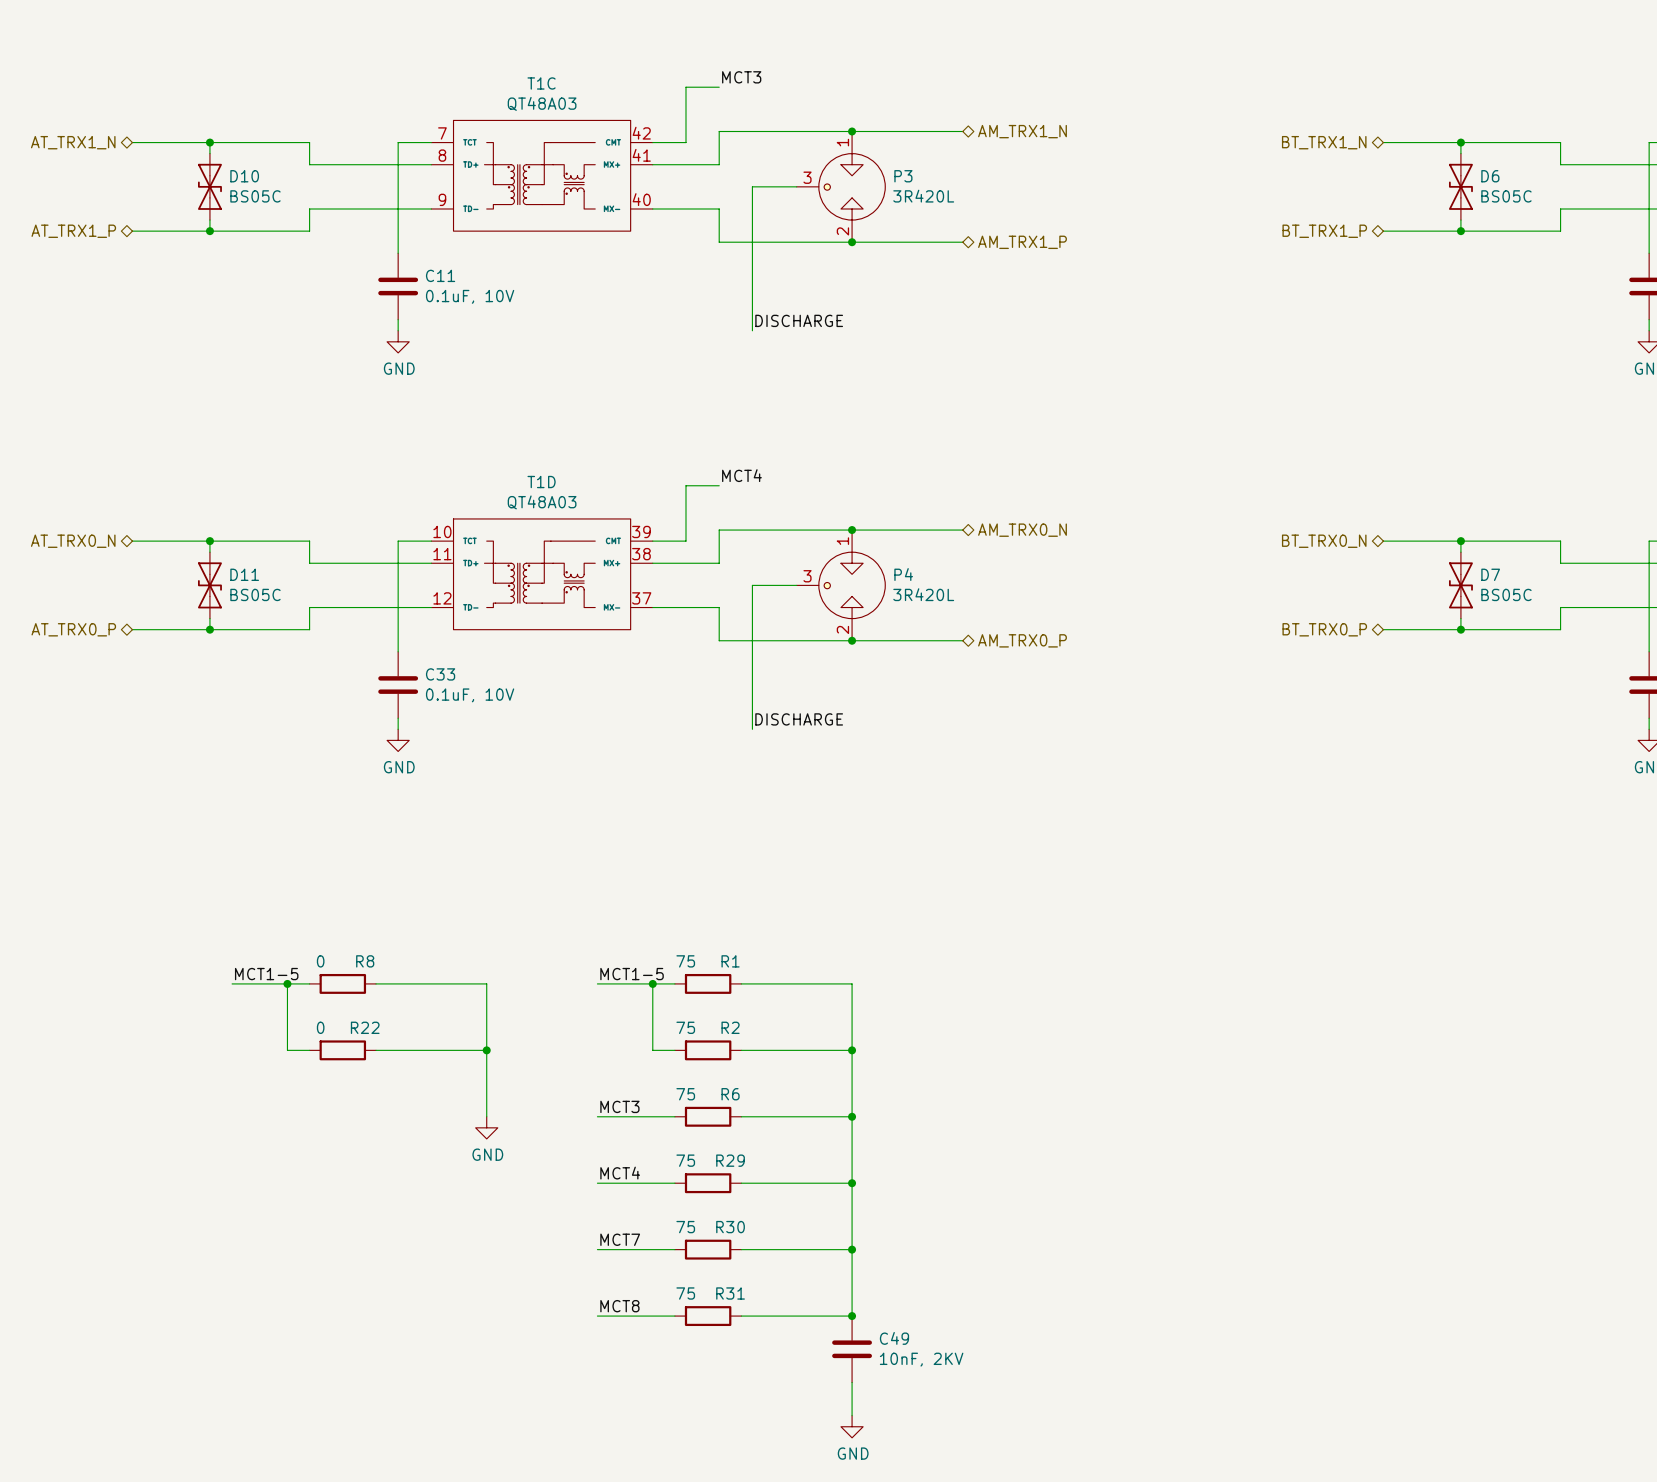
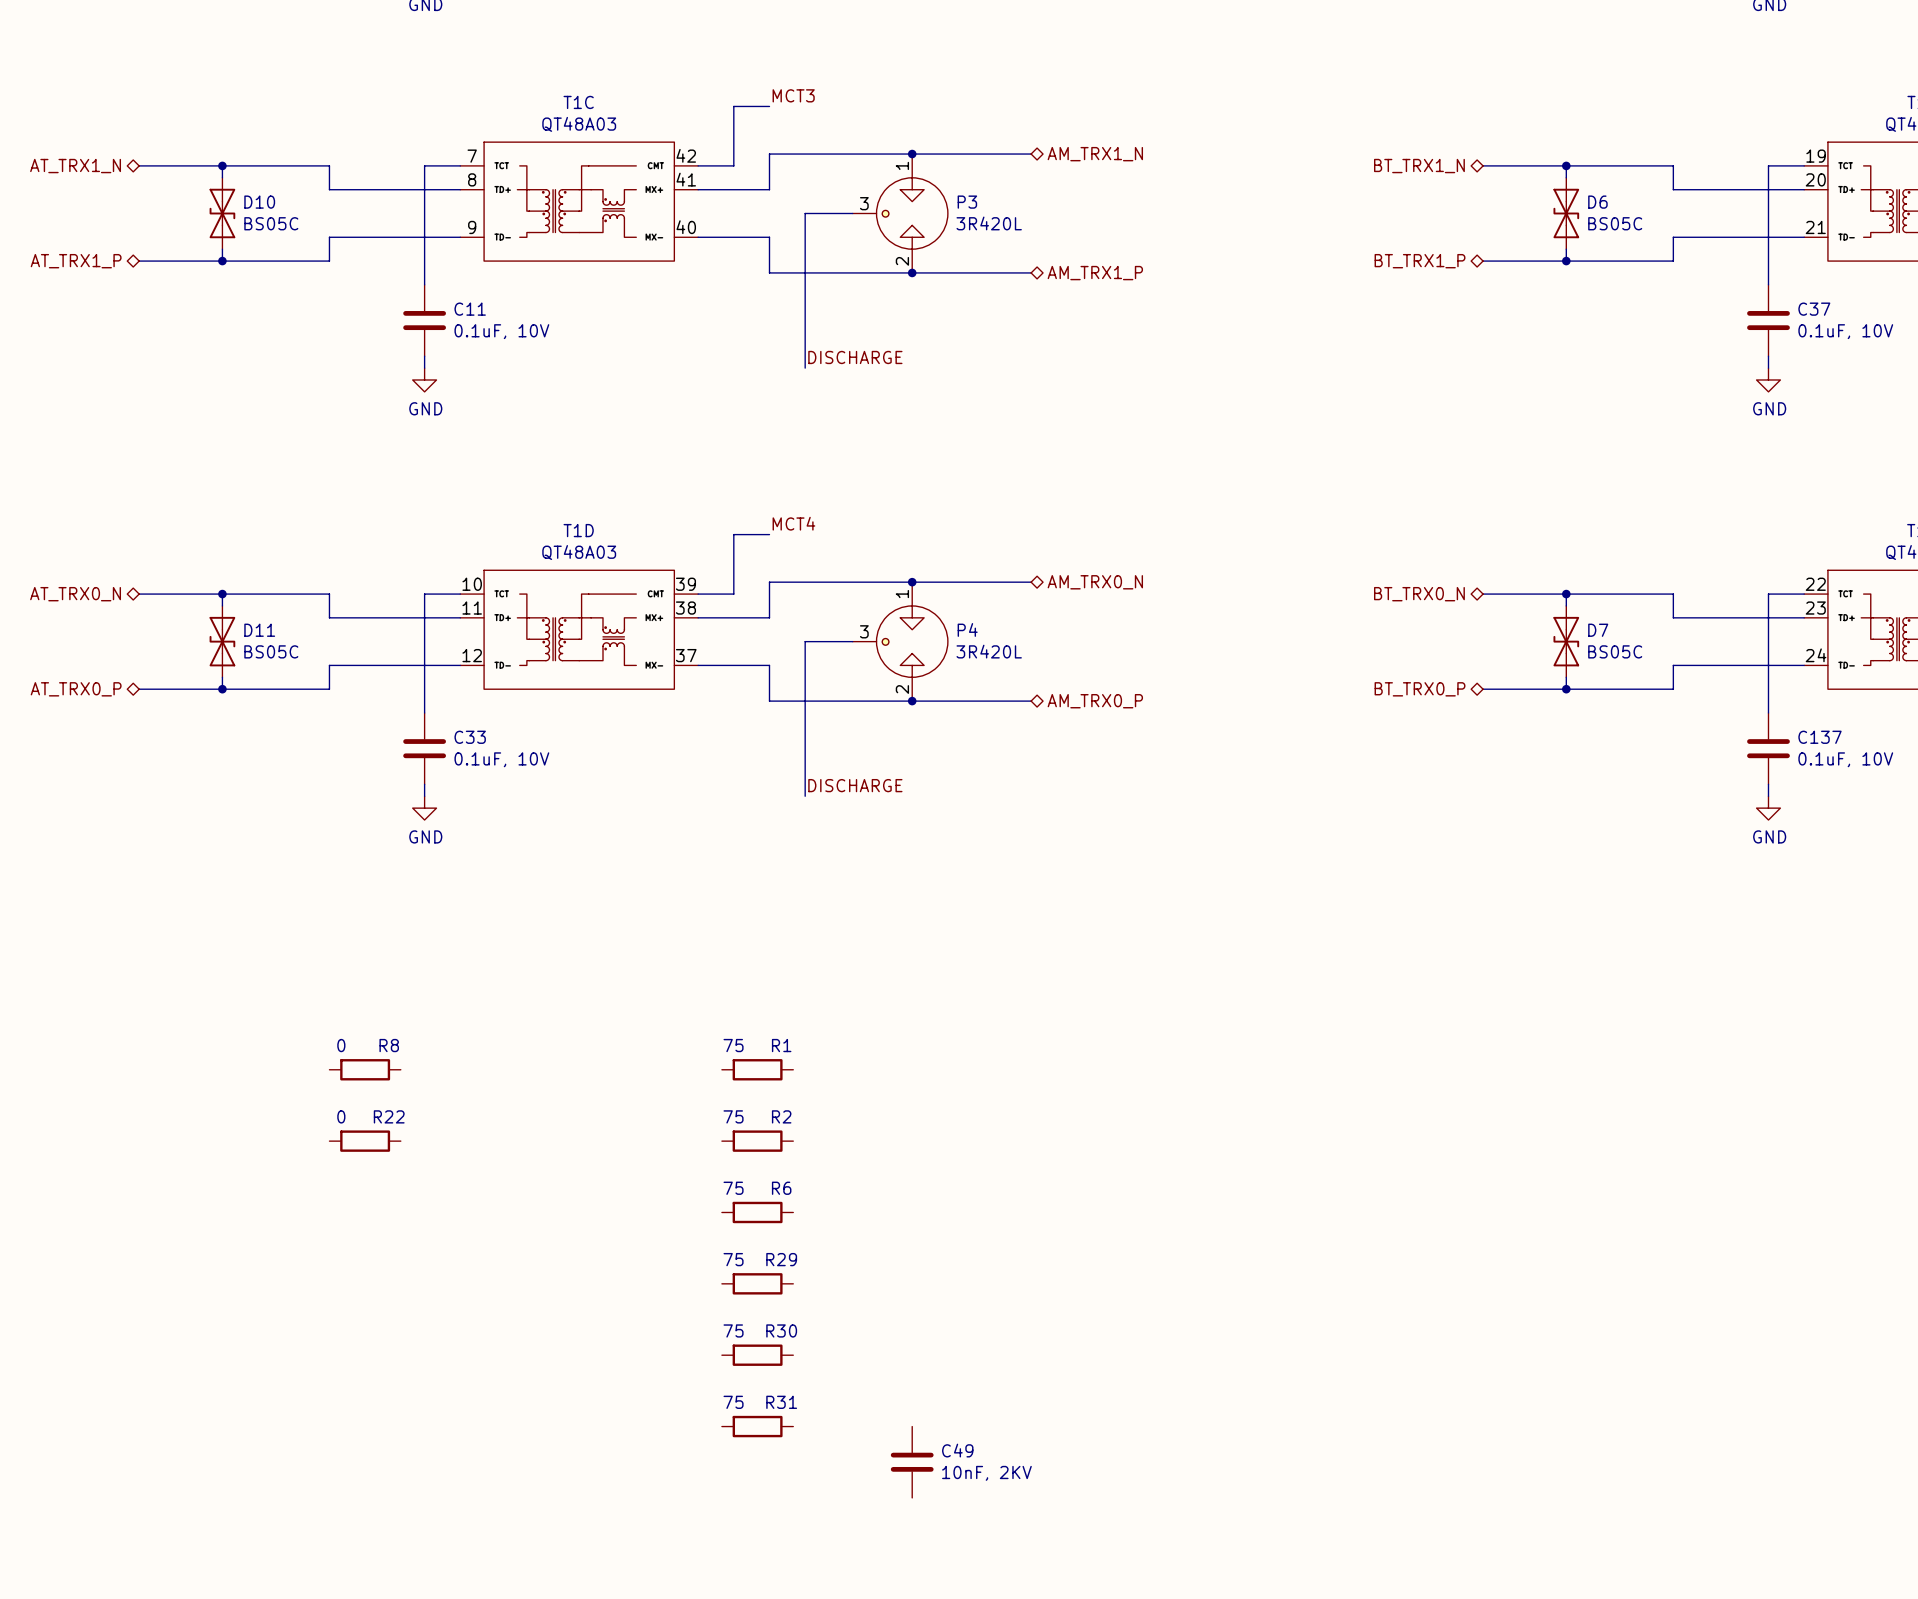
label: MCT1-5 (266, 974) -> none
label: MCT1-5 (632, 974) -> none
wire: (232, 983) (309, 983) -> none
wire: (287, 983) (287, 1050) (309, 1050) -> none
junction: (287, 983) -> none
wire: (376, 983) (486, 983) (486, 1116) -> none
wire: (597, 983) (674, 983) -> none
wire: (652, 983) (652, 1050) (674, 1050) -> none
junction: (652, 983) -> none
wire: (741, 983) (852, 983) (852, 1316) (741, 1316) -> none
wire: (376, 1050) (486, 1050) -> none
junction: (486, 1050) -> none
wire: (741, 1050) (852, 1050) -> none
junction: (852, 1050) -> none
label: MCT3 (619, 1106) -> none
wire: (597, 1116) (674, 1116) -> none
wire: (741, 1116) (852, 1116) -> none
junction: (852, 1116) -> none
power symbol: GND (486, 1127) -> none
label: MCT4 (620, 1173) -> none
wire: (597, 1183) (674, 1183) -> none
wire: (741, 1183) (852, 1183) -> none
junction: (852, 1183) -> none
label: MCT7 (620, 1239) -> none
wire: (597, 1249) (674, 1249) -> none
wire: (741, 1249) (852, 1249) -> none
junction: (852, 1249) -> none
label: MCT8 (619, 1306) -> none
wire: (597, 1316) (674, 1316) -> none
junction: (852, 1316) -> none
wire: (852, 1382) (852, 1415) -> none
power symbol: GND (852, 1426) -> none

